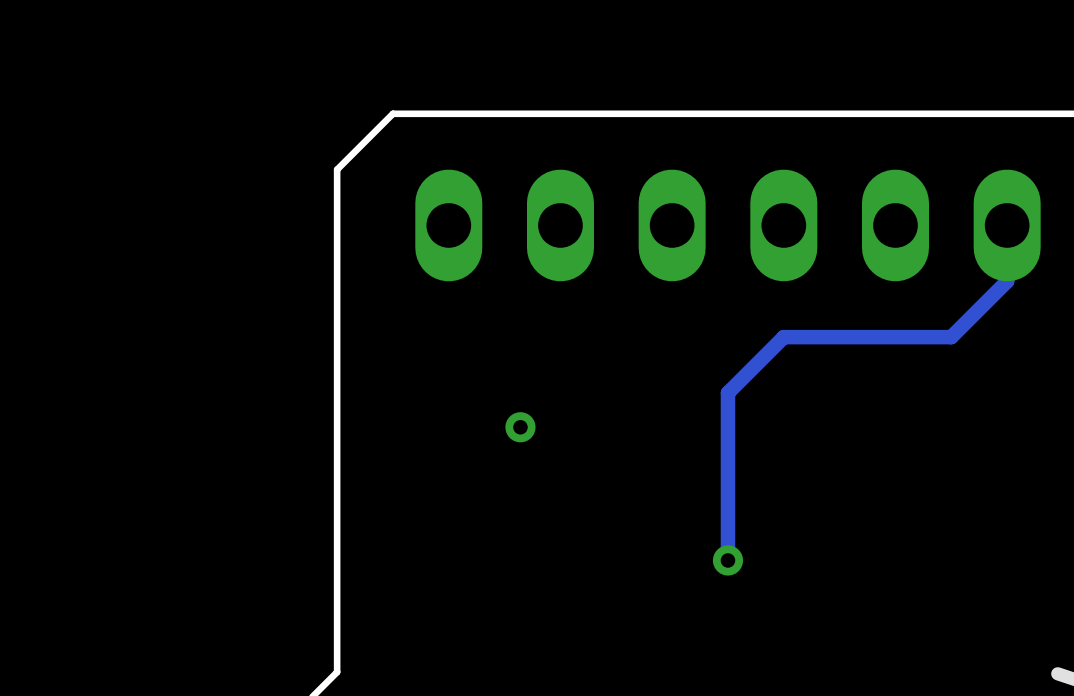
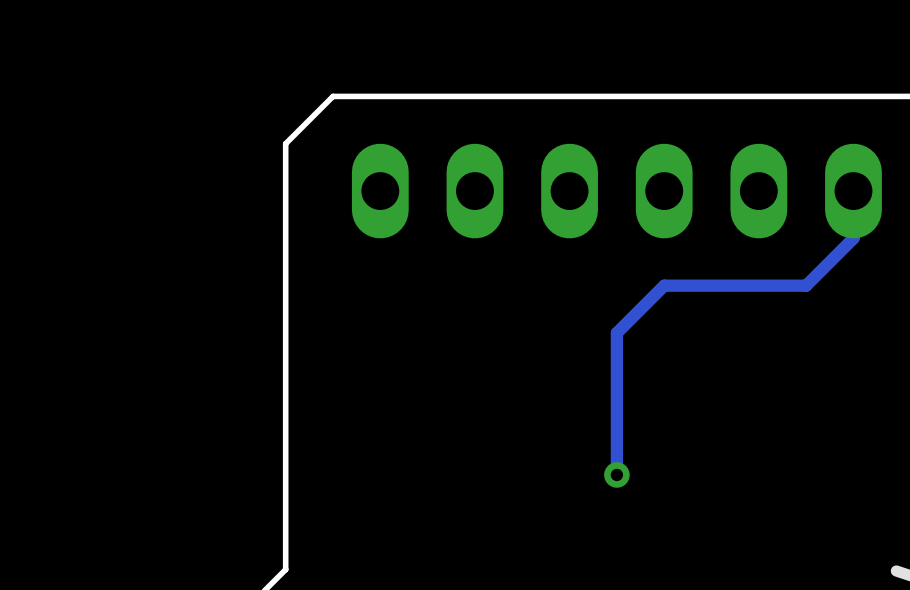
part: (520, 427) -> none

